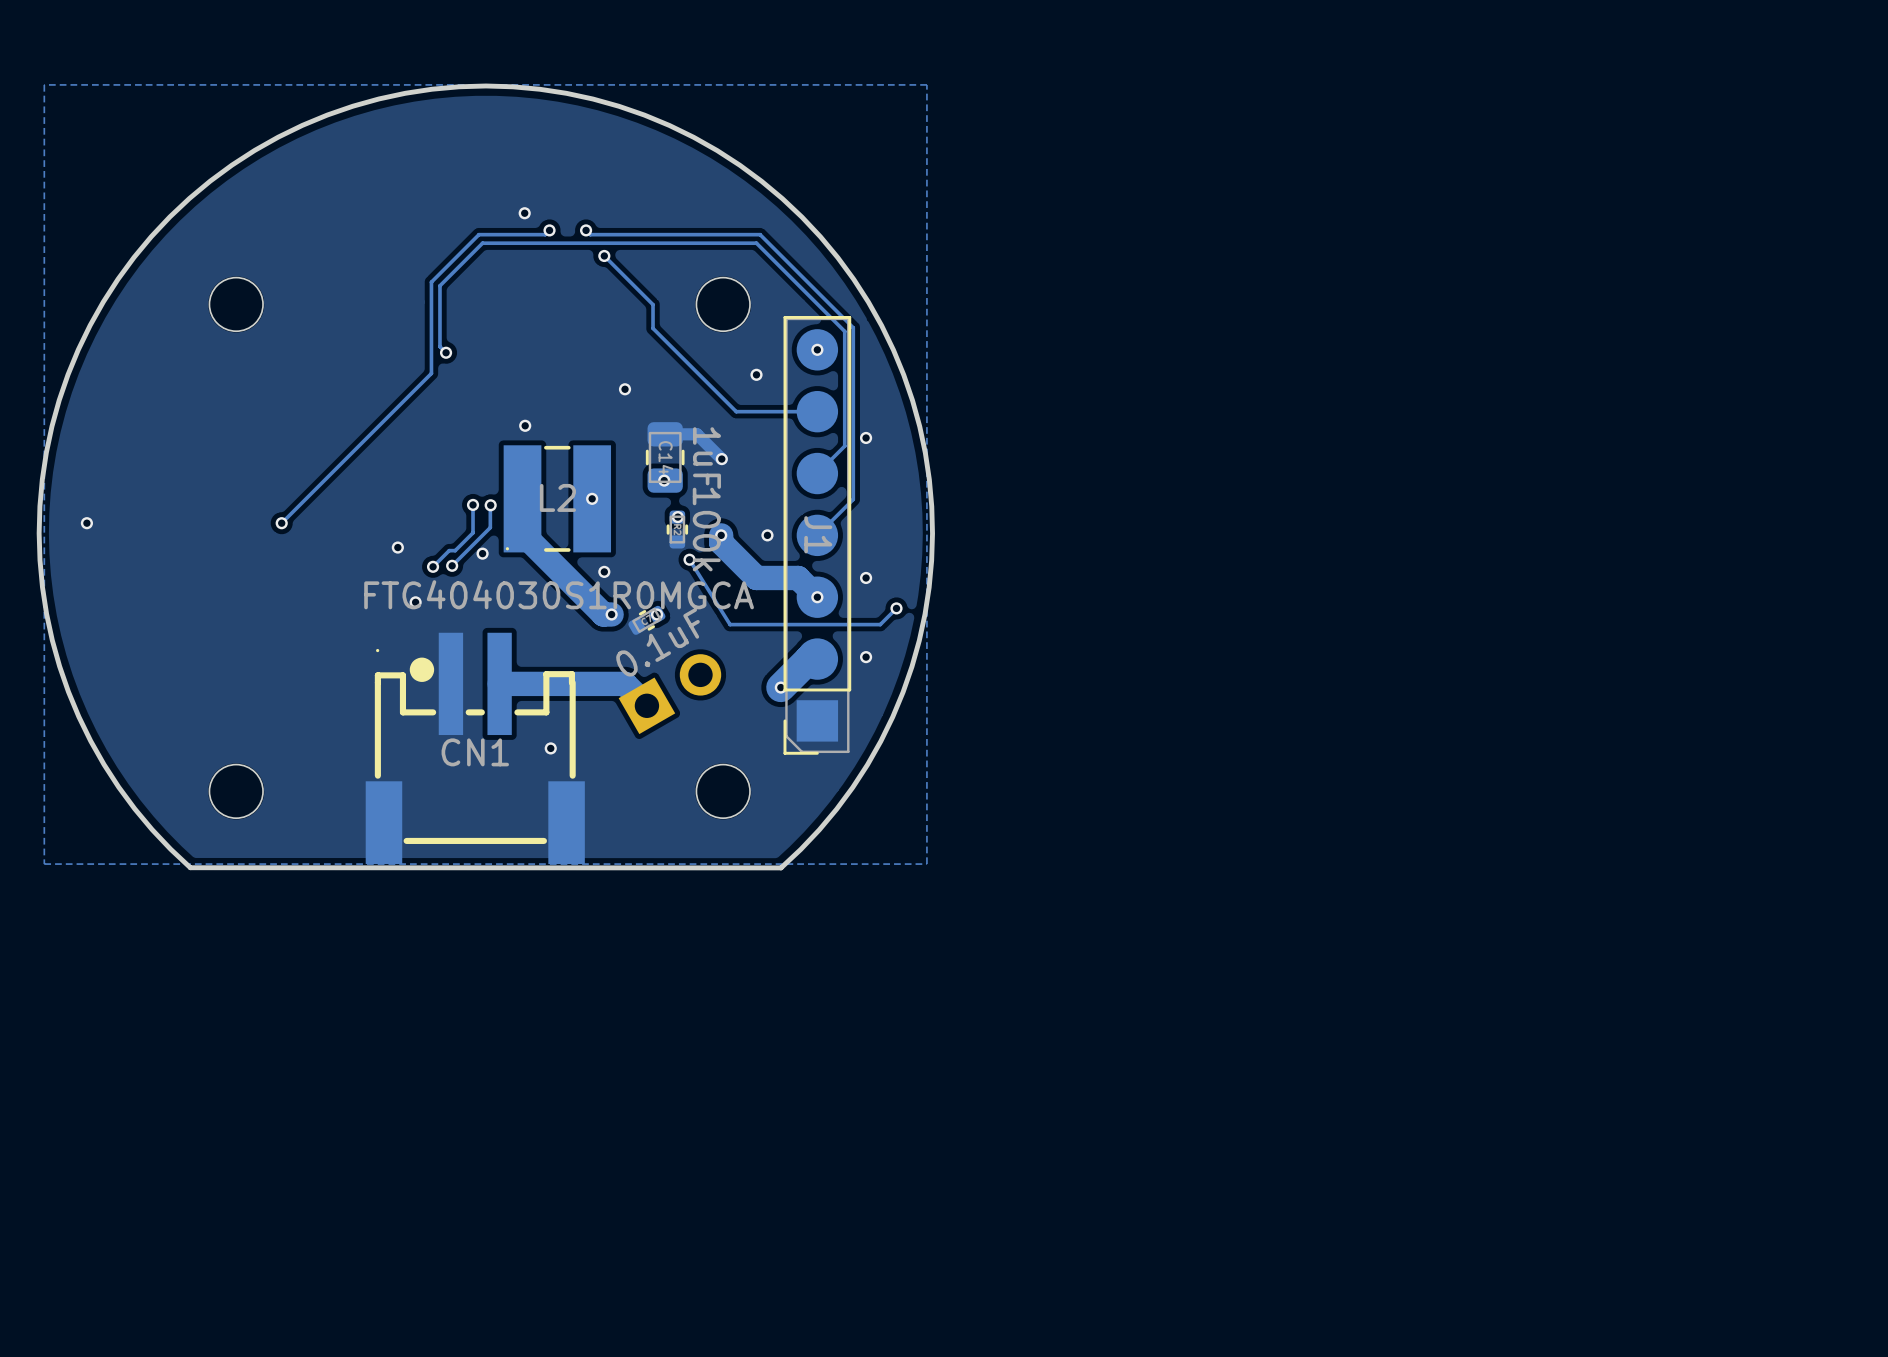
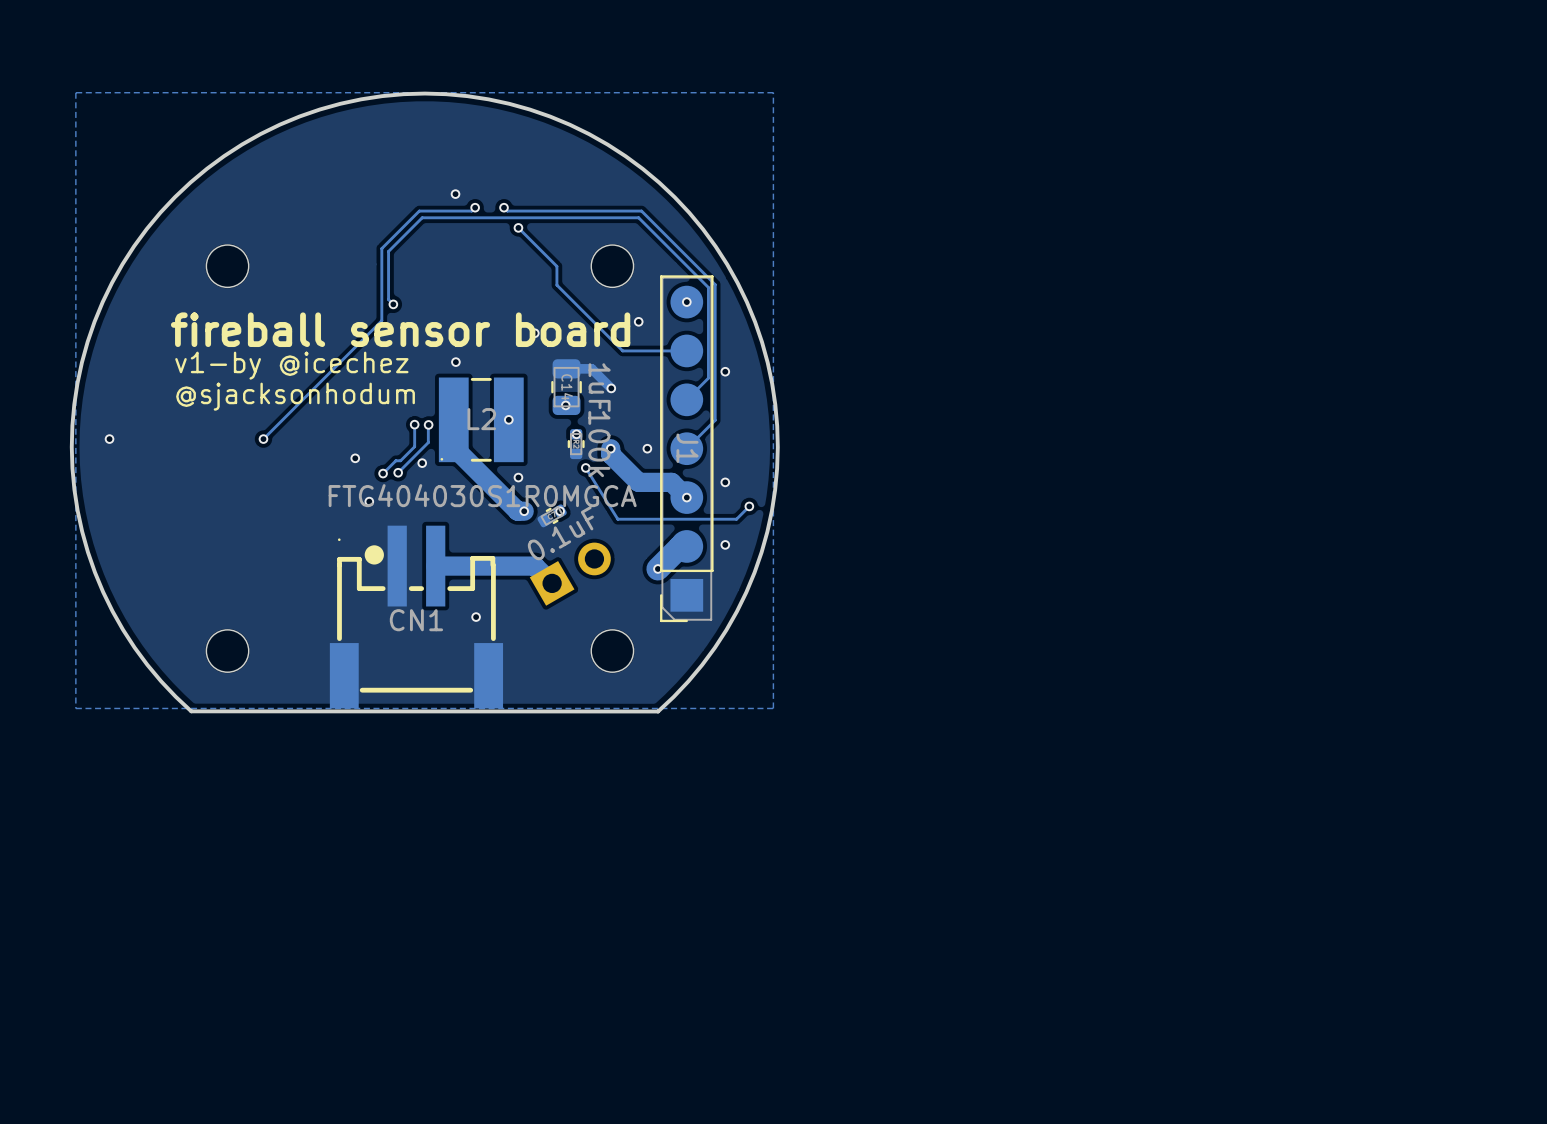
text: none -> fireball sensor board (400, 329)
text: none -> v1-by @icechez (291, 365)
text: none -> @sjacksonhodum (295, 396)

